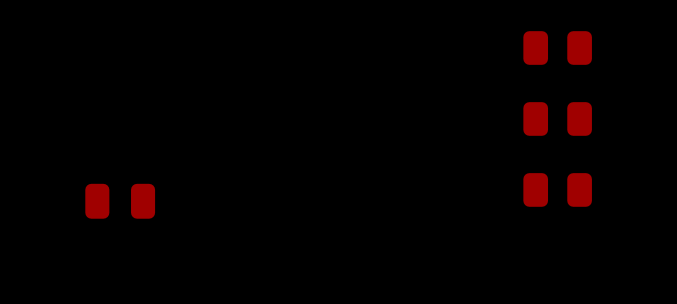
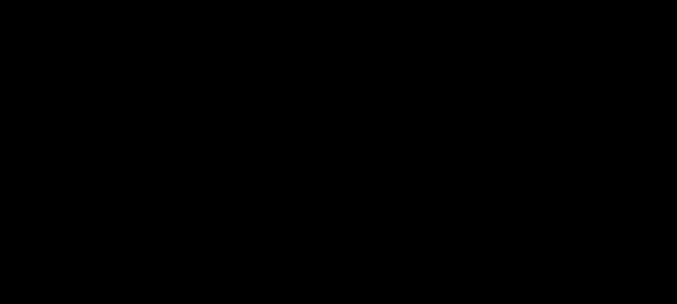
part: (557, 47) -> none
part: (557, 118) -> none
part: (557, 189) -> none
part: (120, 201) -> none

